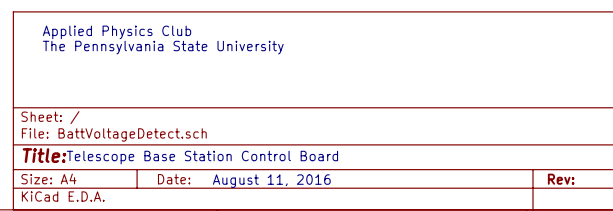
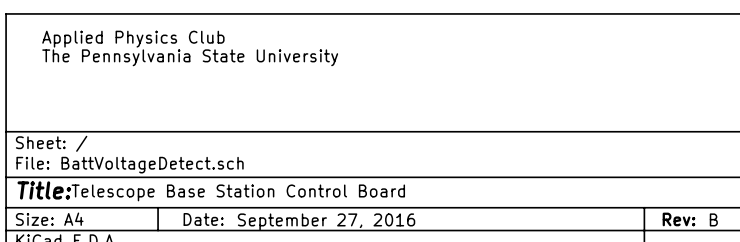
text: none -> B (713, 219)
text: August 11, 2016 (271, 181) -> none
text: none -> September 27, 2016 (326, 221)

